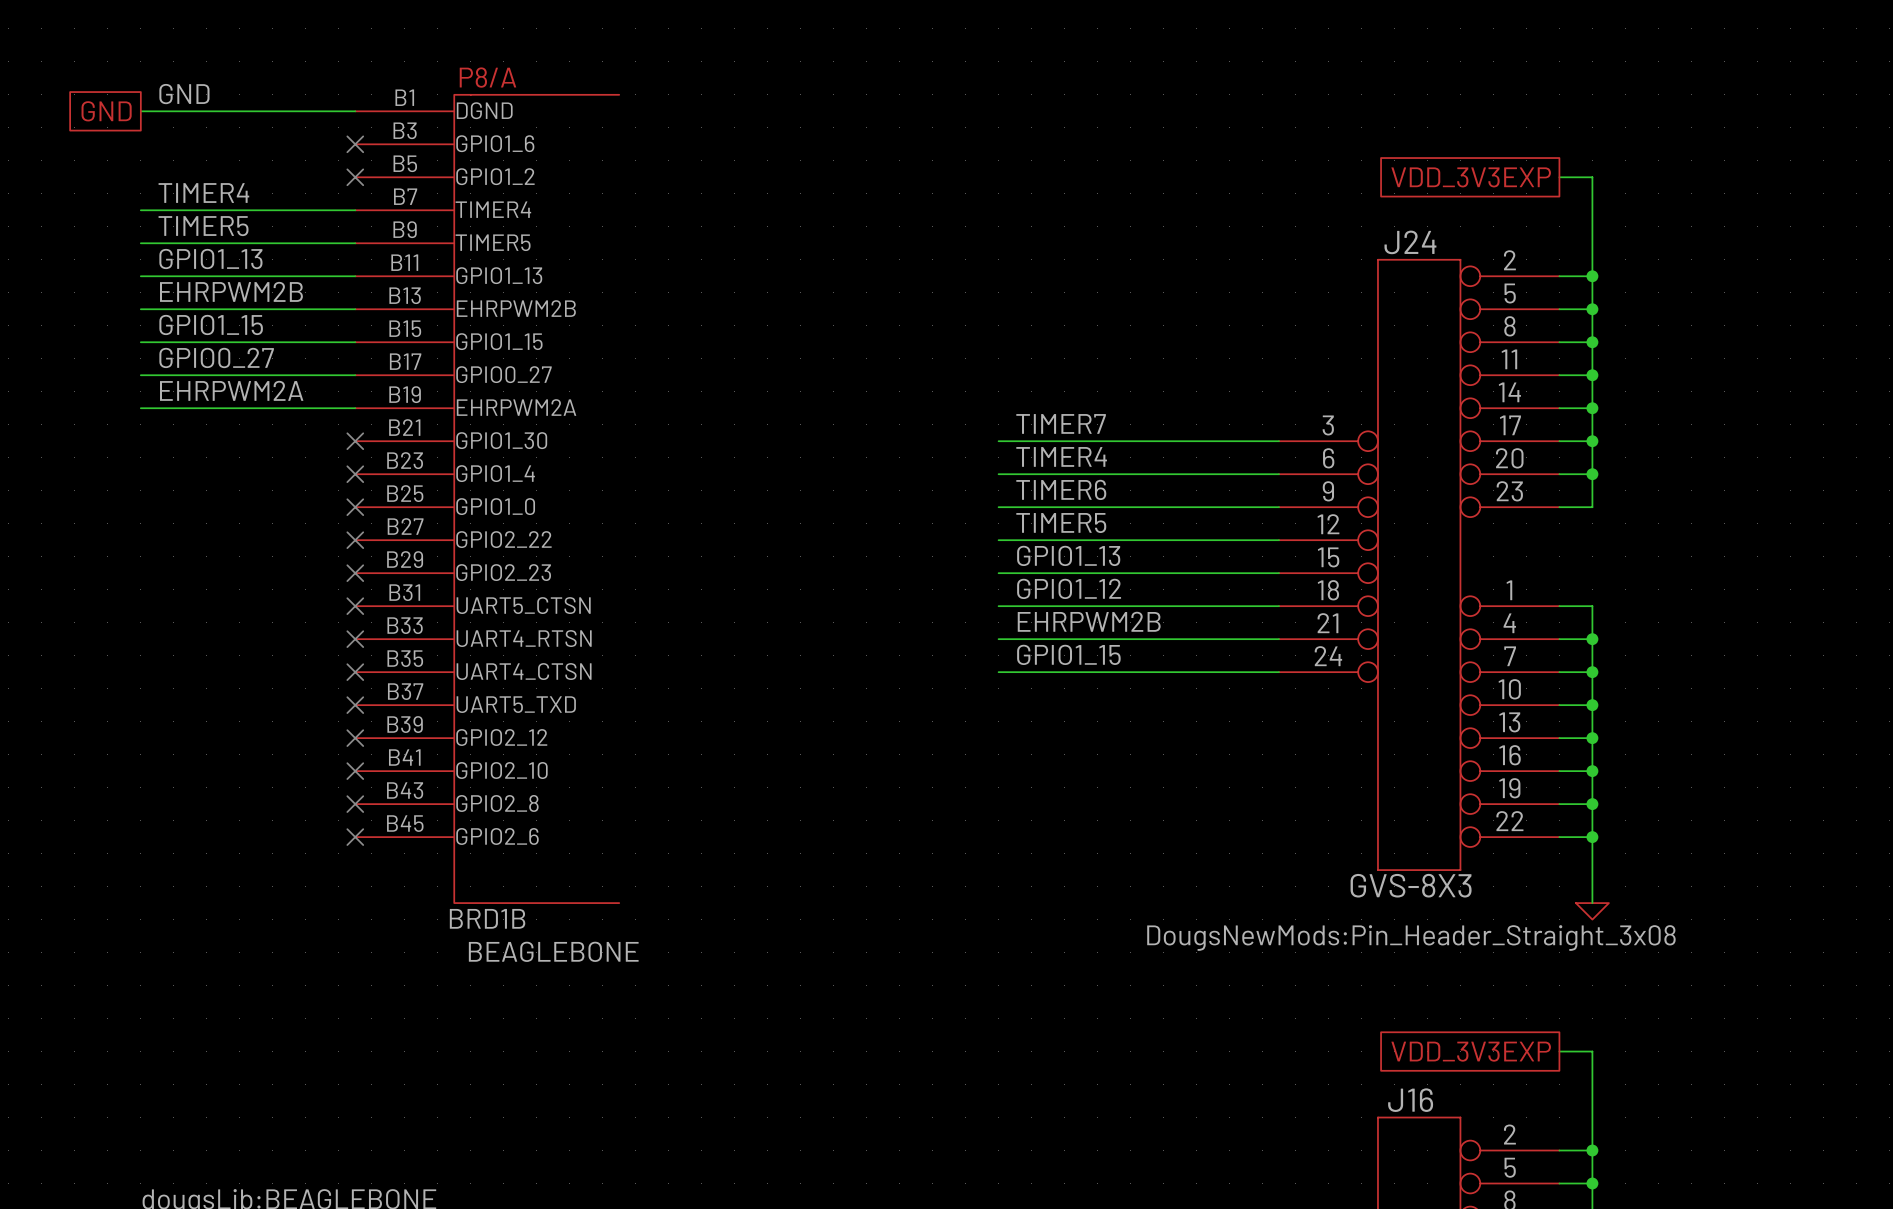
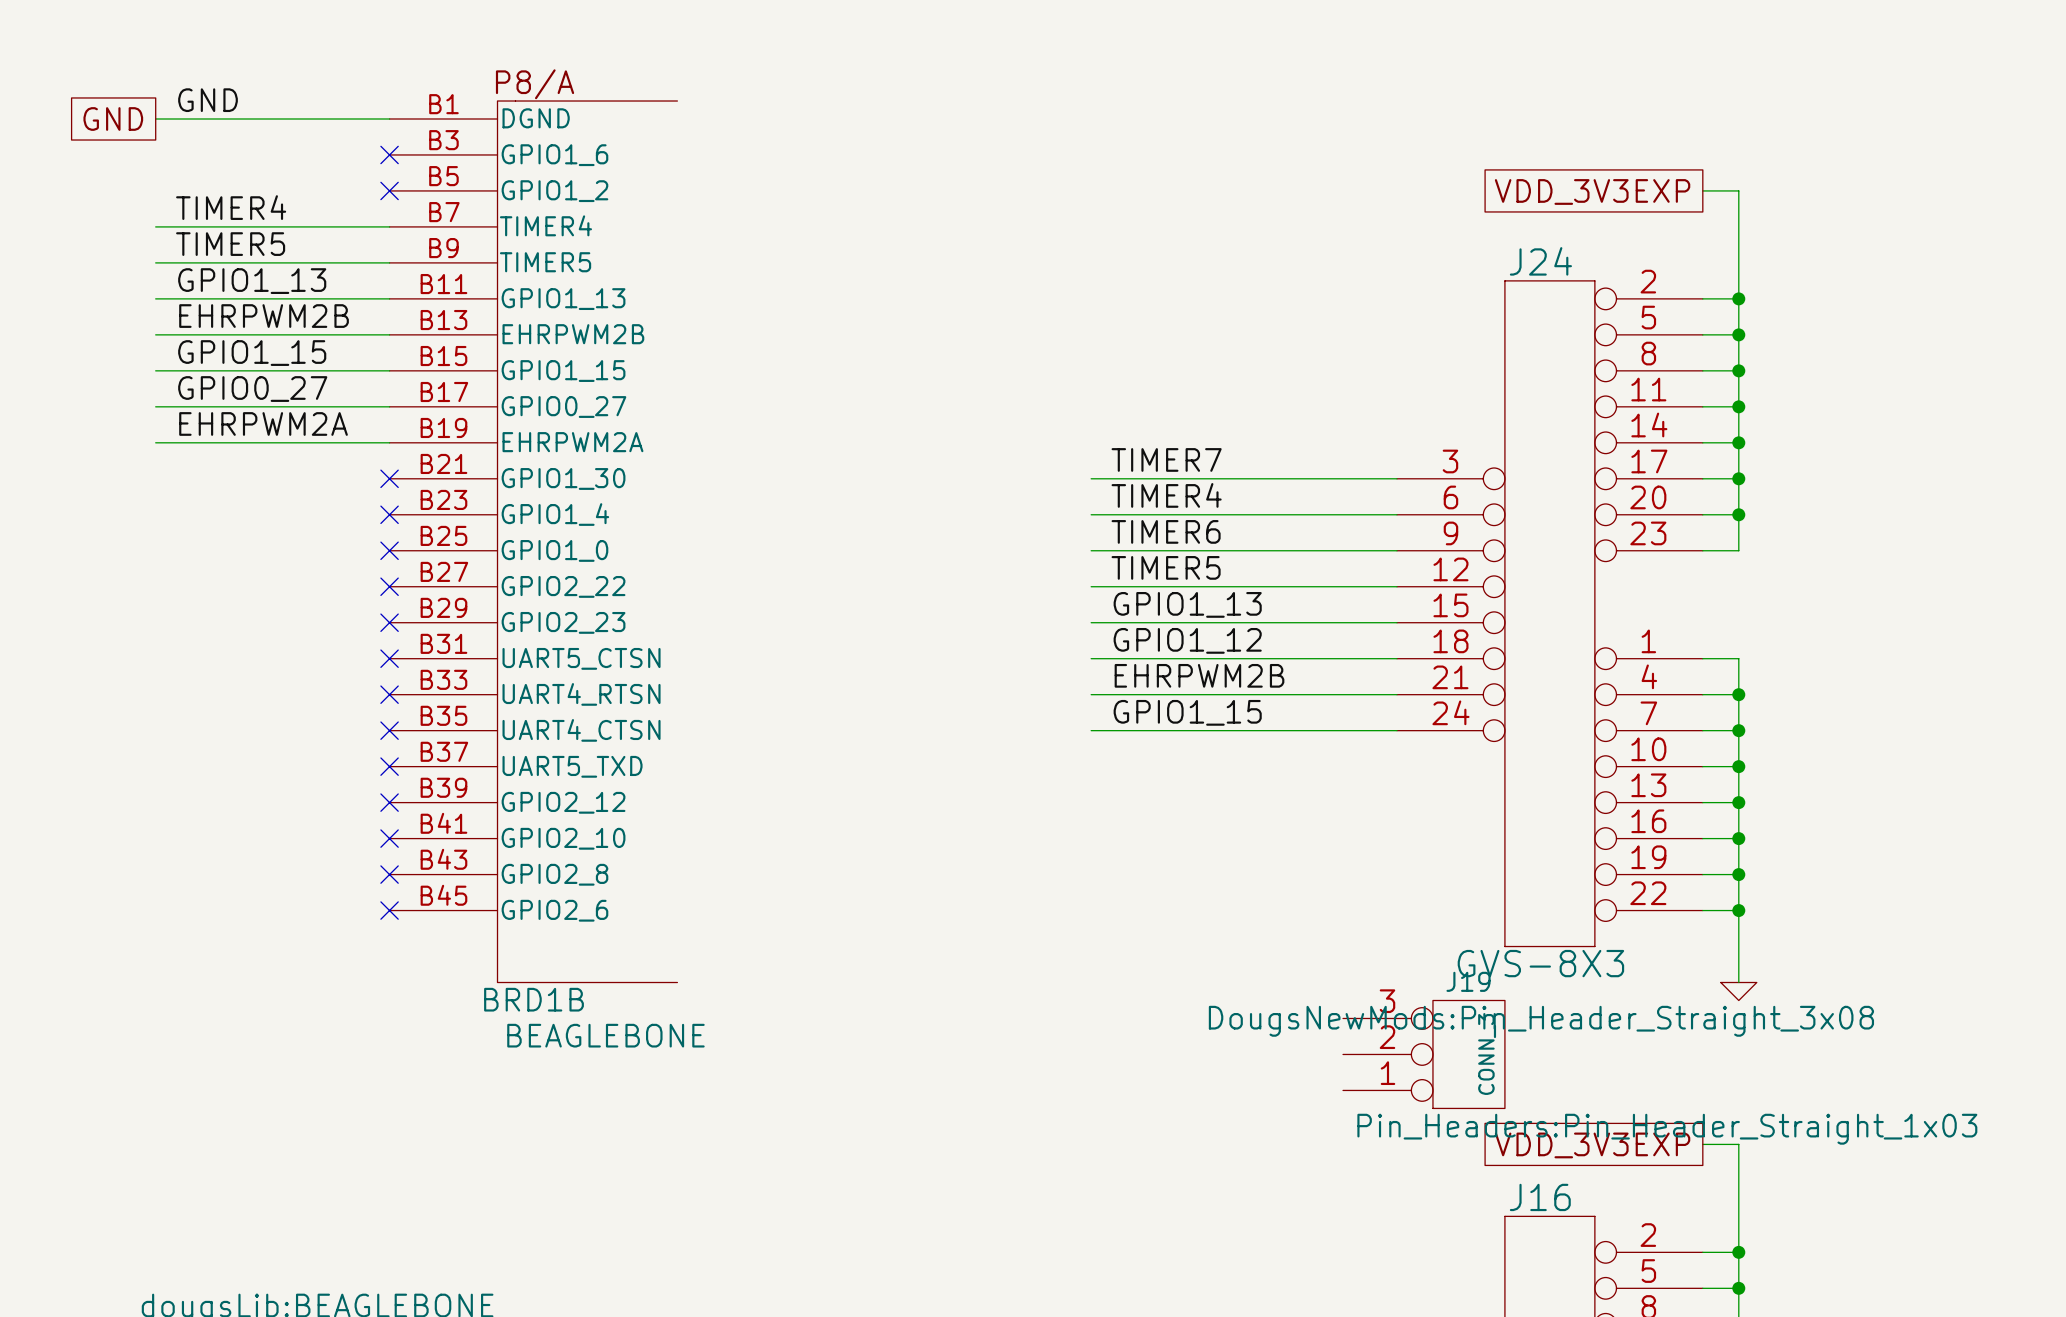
J19: none -> CONN_3 (1423, 1054)

